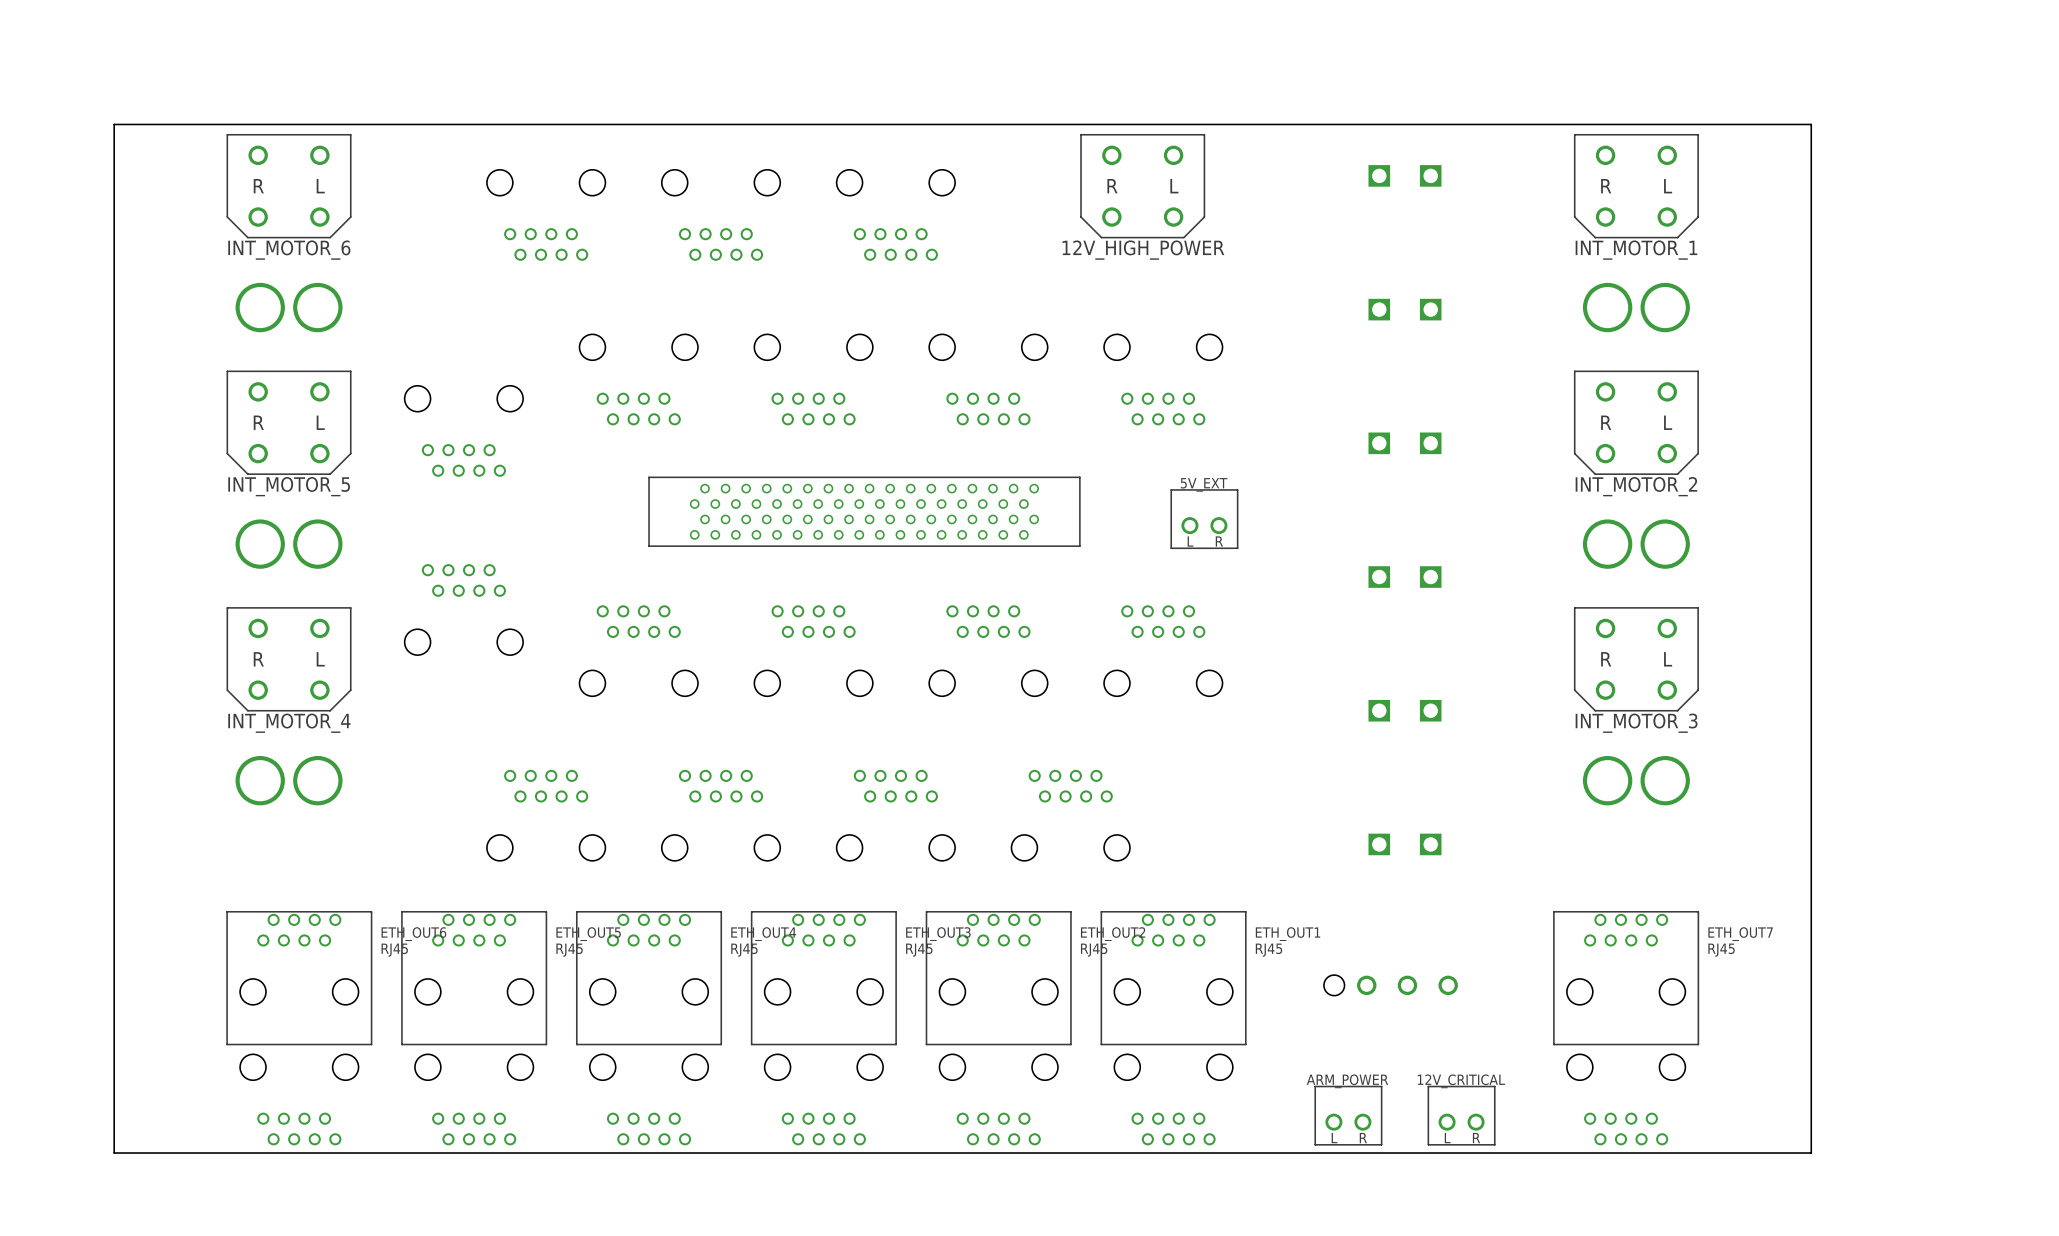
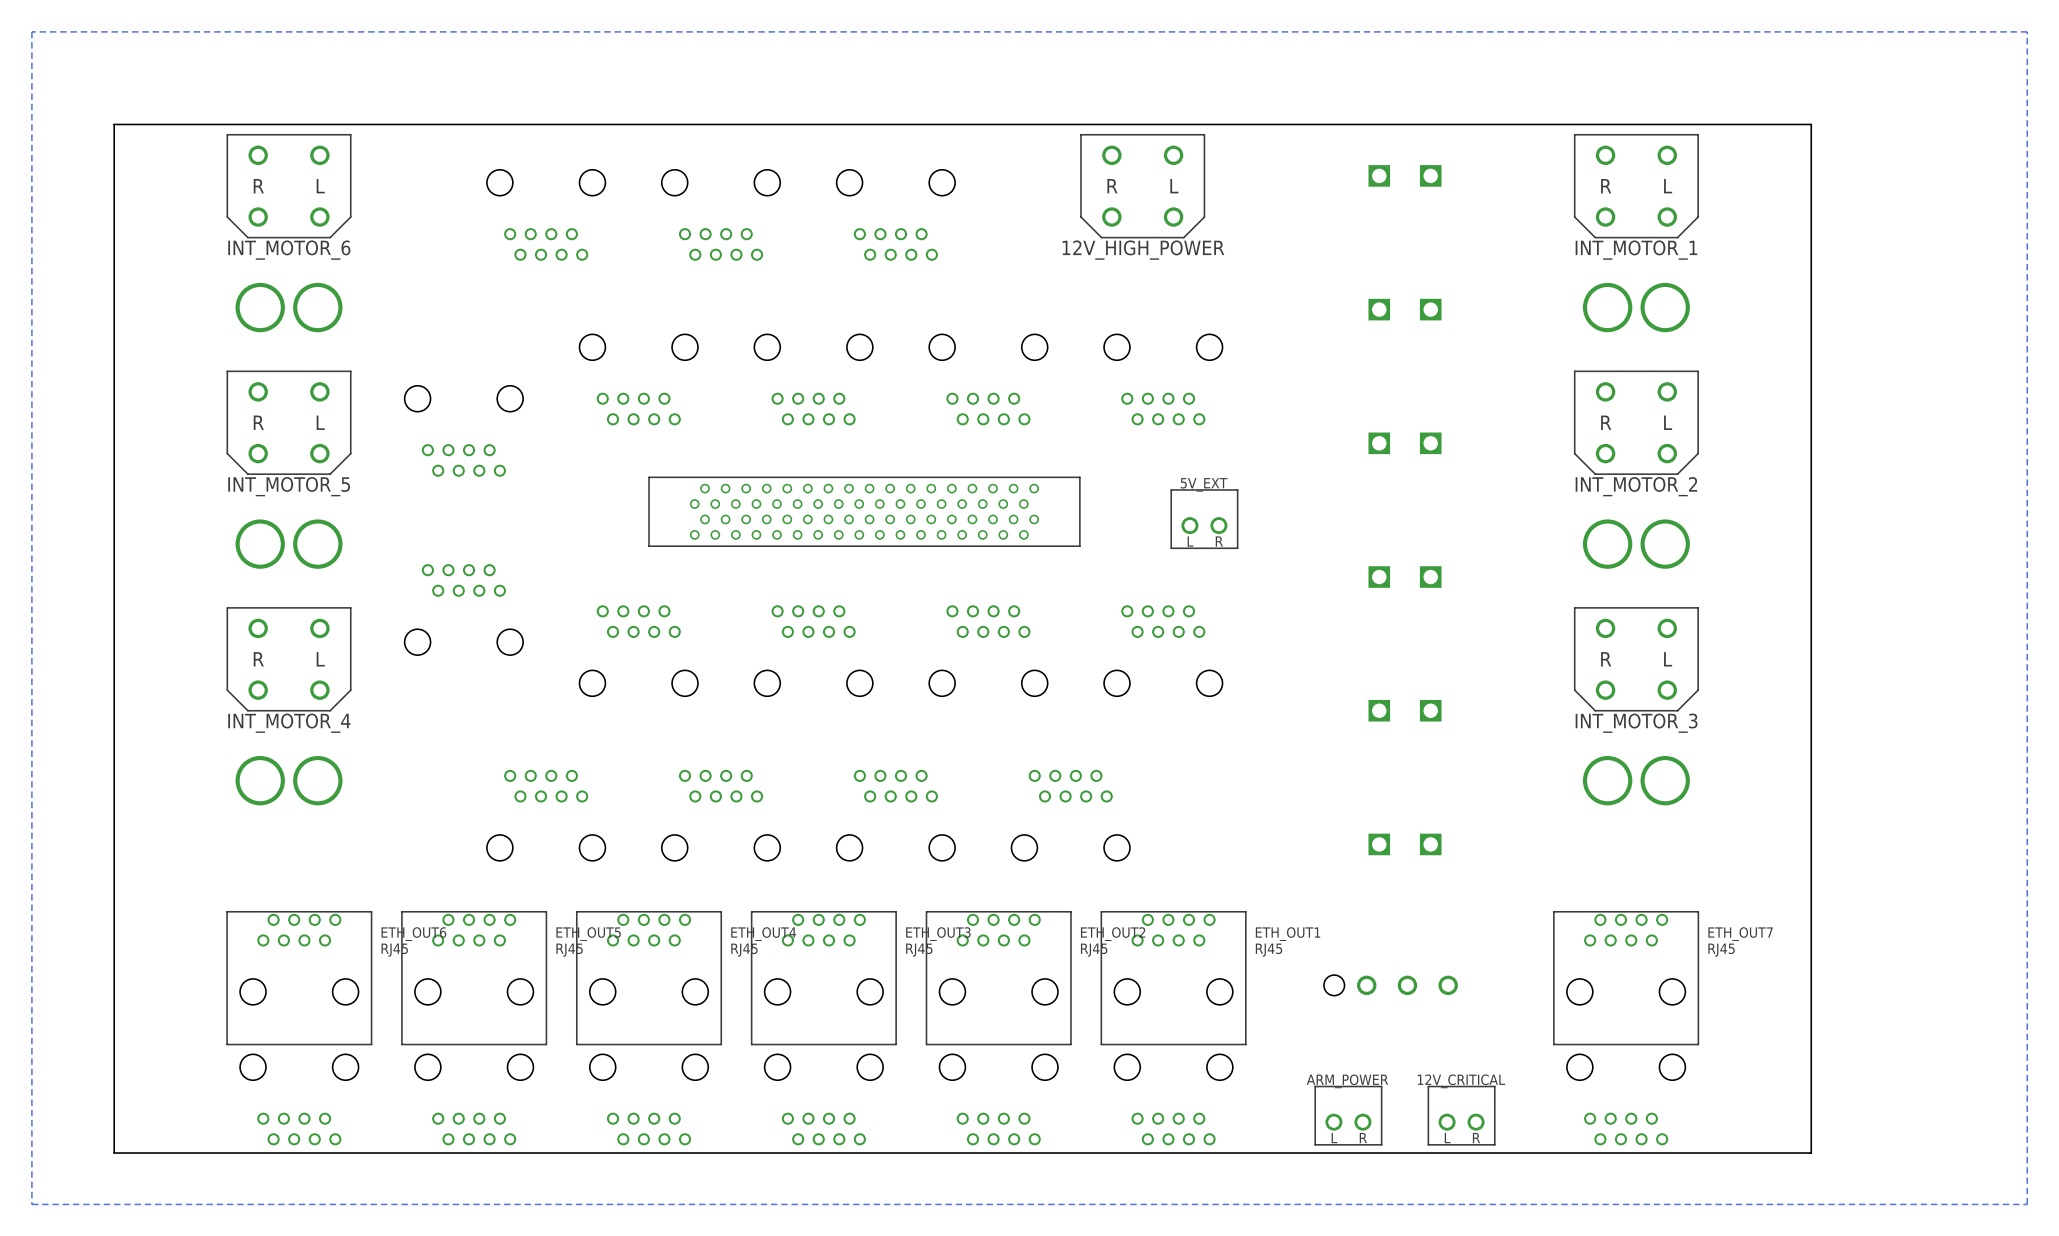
bottom zone outline: none -> (2027, 31) (31, 31) (31, 1204) (2027, 1204) (2027, 31)

